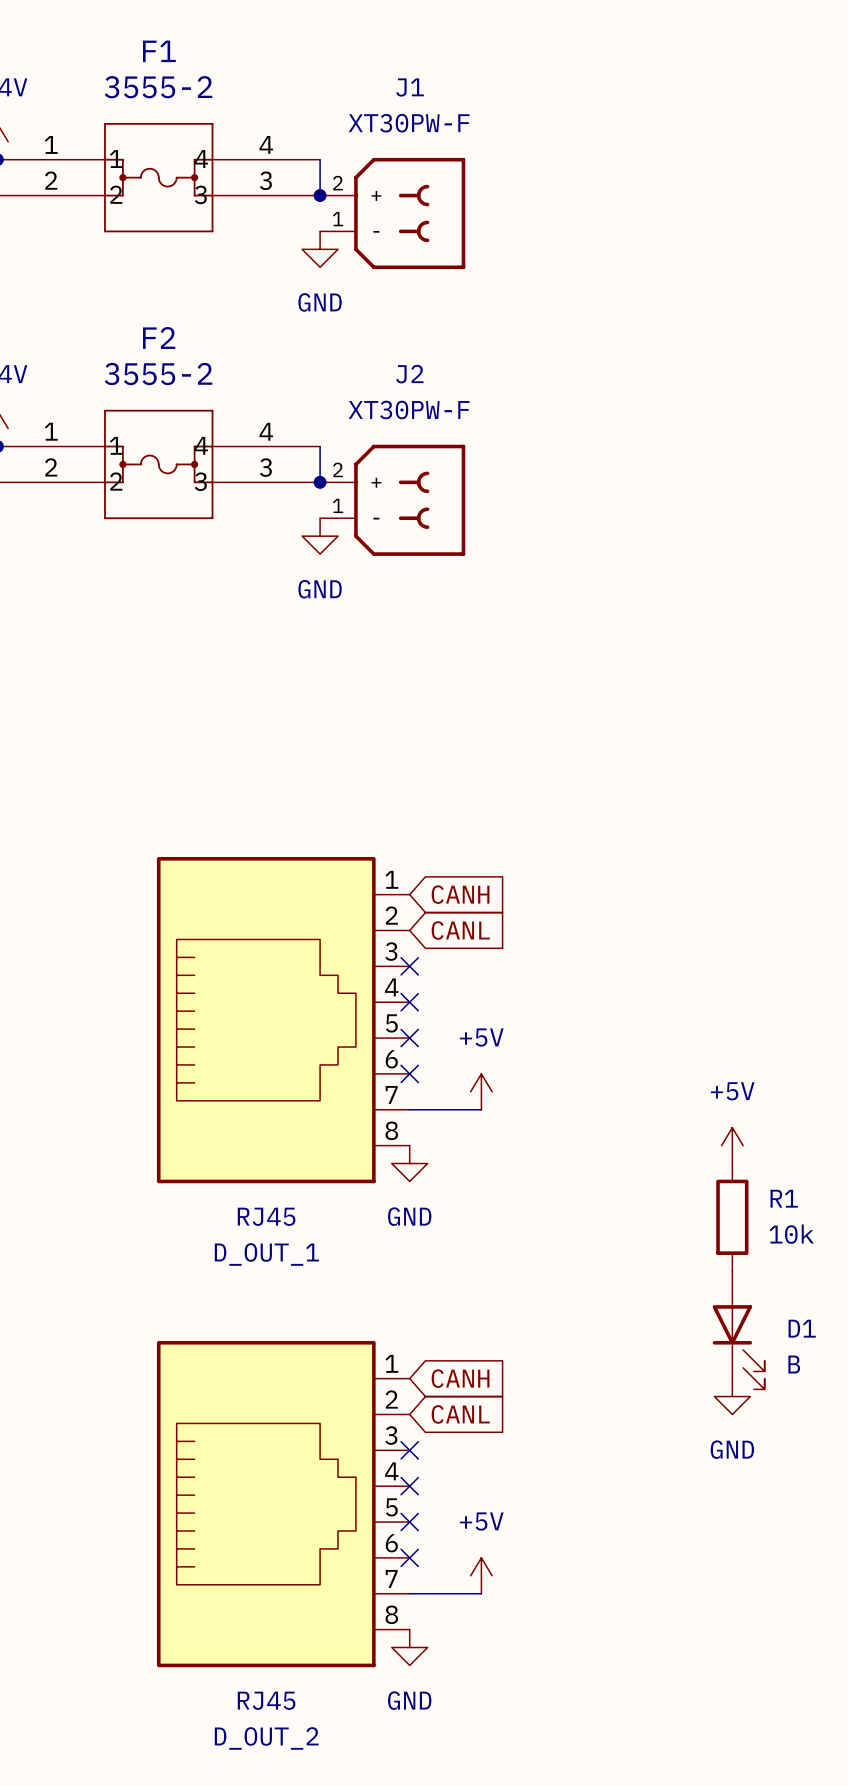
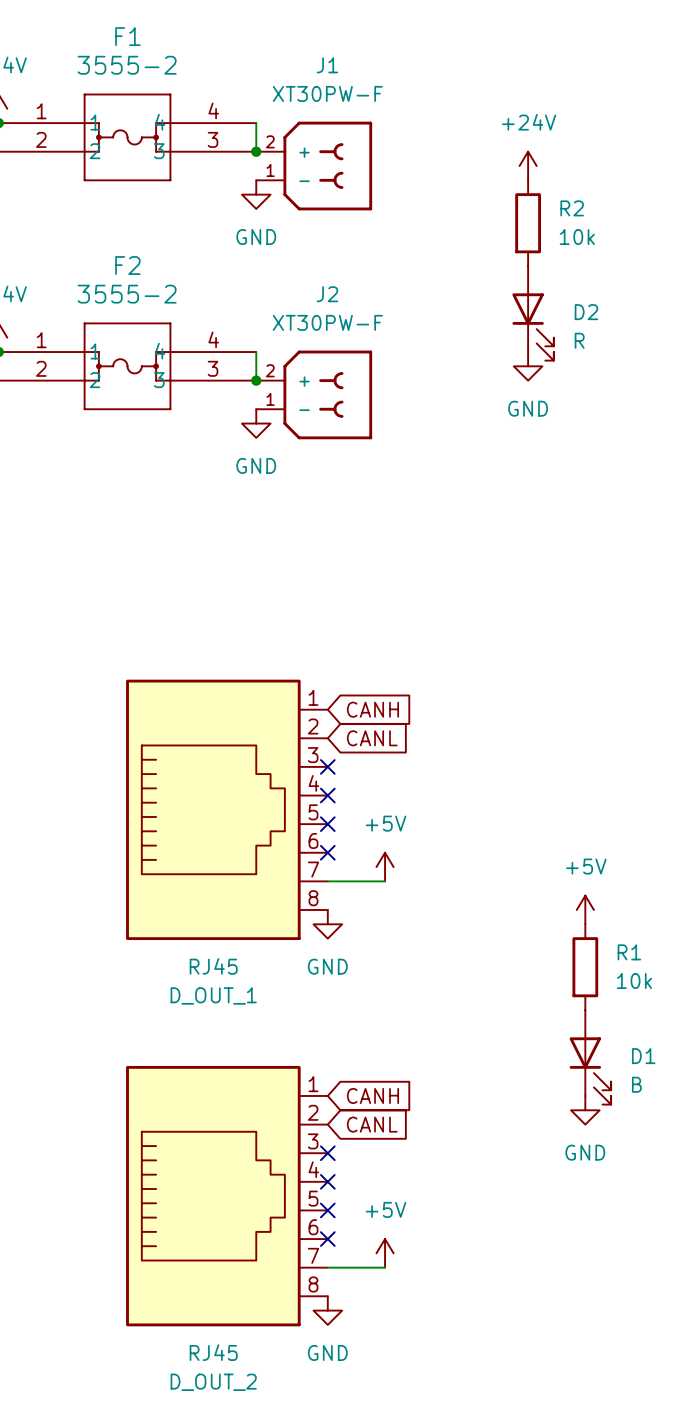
power symbol: none -> +24V (528, 166)
R2: none -> 10k (528, 223)
D2: none -> R (533, 313)
power symbol: none -> GND (528, 366)

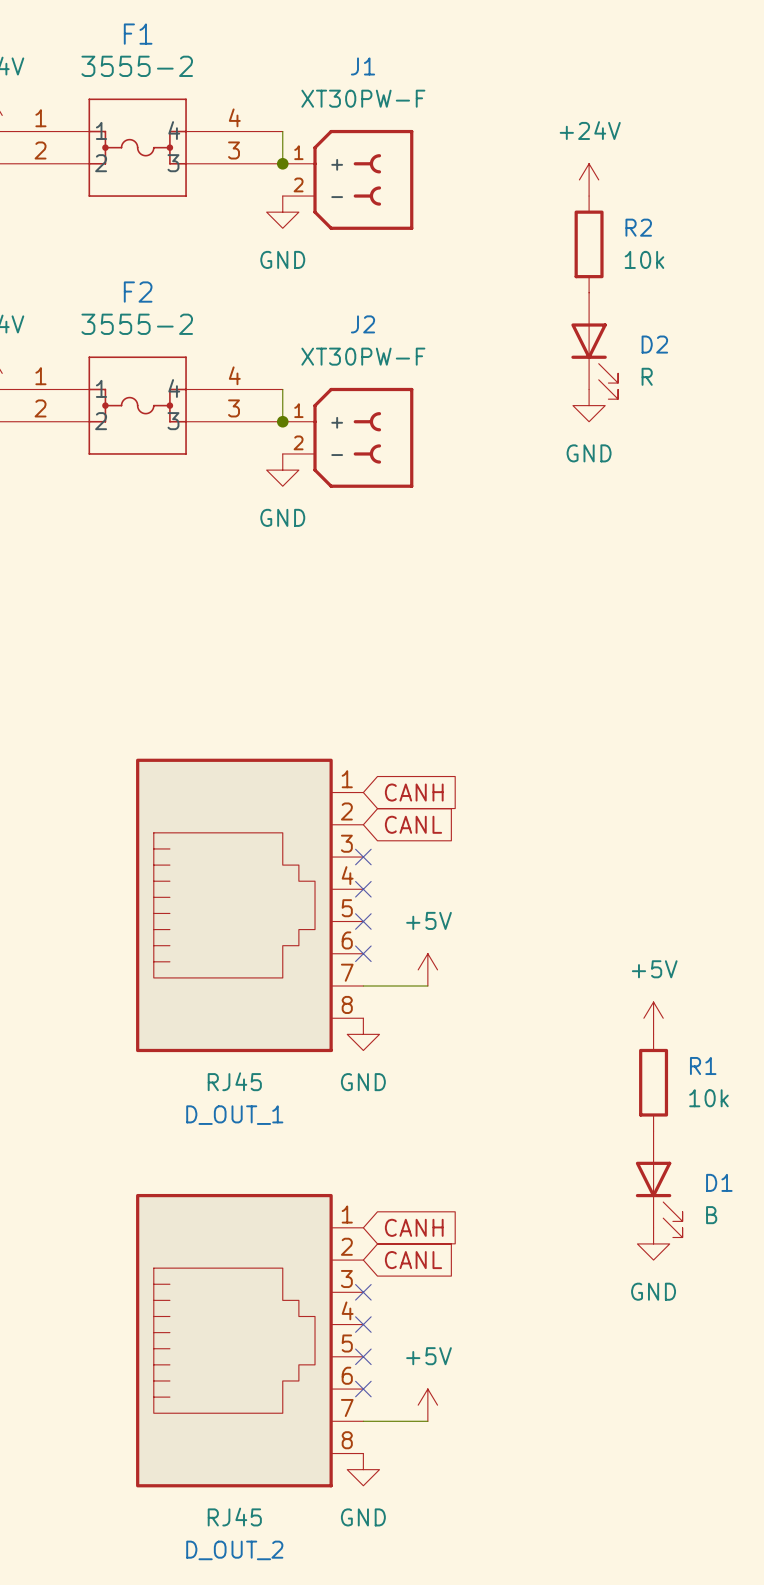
J1 pin number: 2 (270, 141) -> 1 (298, 152)
J1 pin number: 1 (270, 170) -> 2 (298, 184)
J2 pin number: 2 (270, 370) -> 1 (298, 410)
J2 pin number: 1 (270, 399) -> 2 (298, 442)

